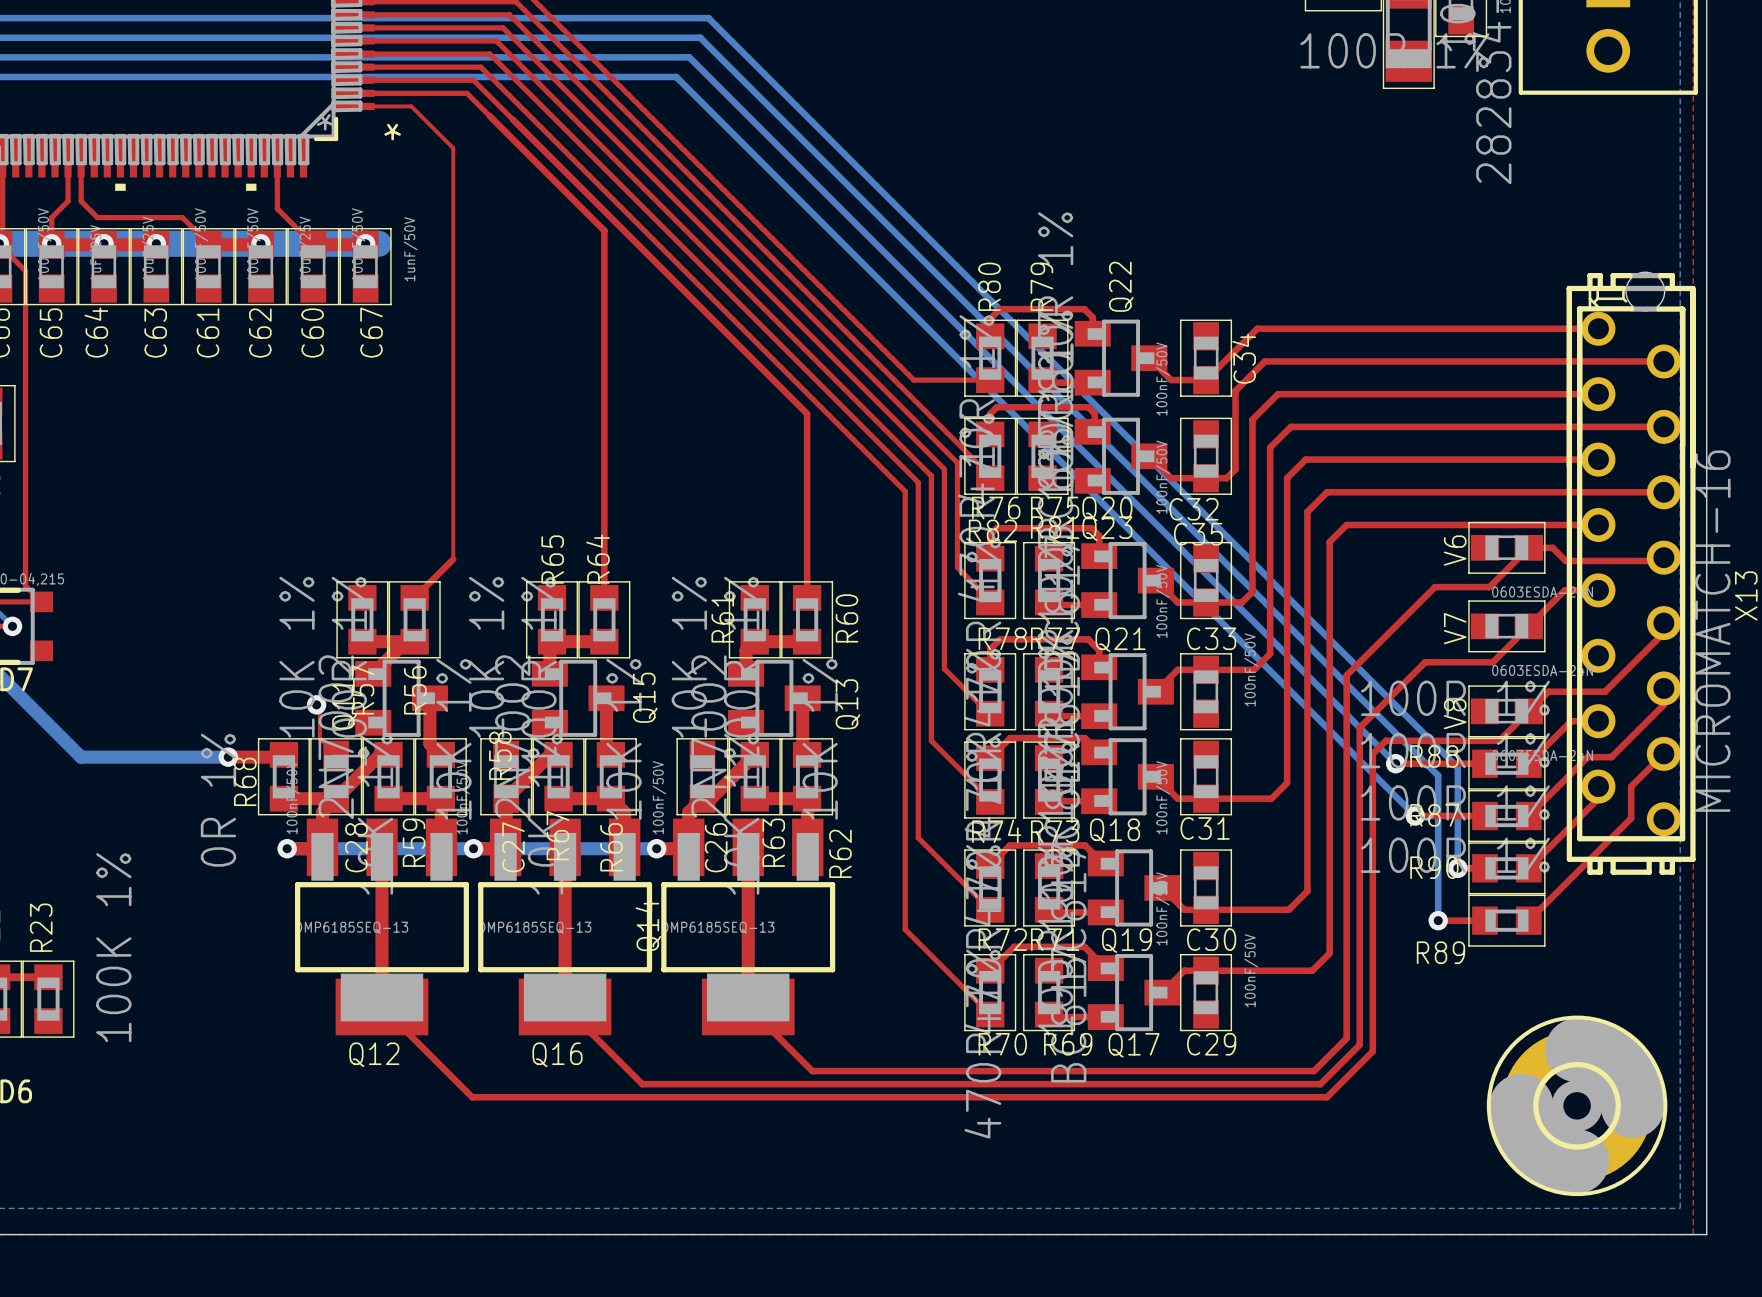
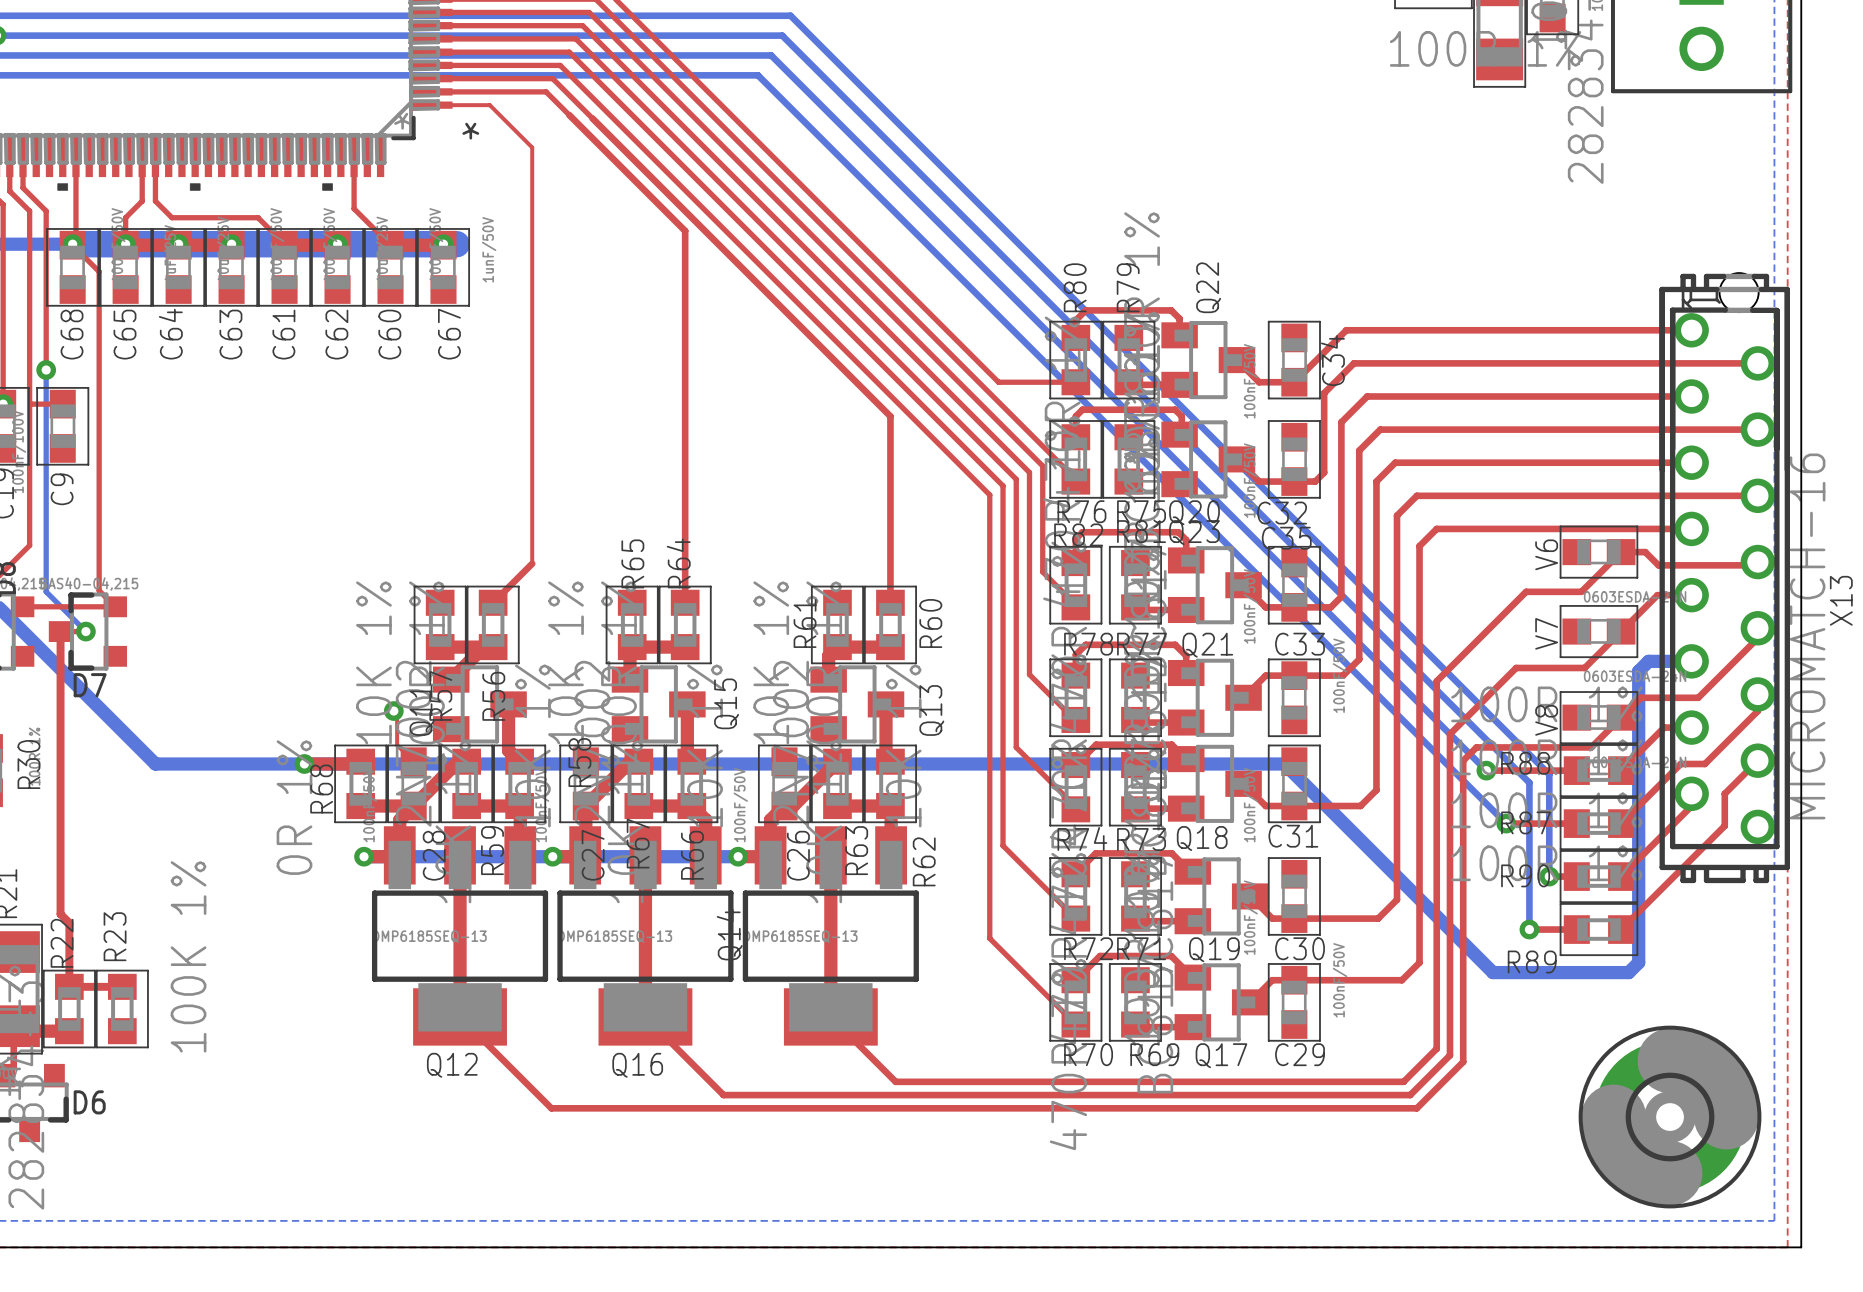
bottom track: none -> (1691, 661) (1648, 661) (1638, 671) (1638, 962) (1628, 972) (1493, 972) (1284, 764) (304, 764)

